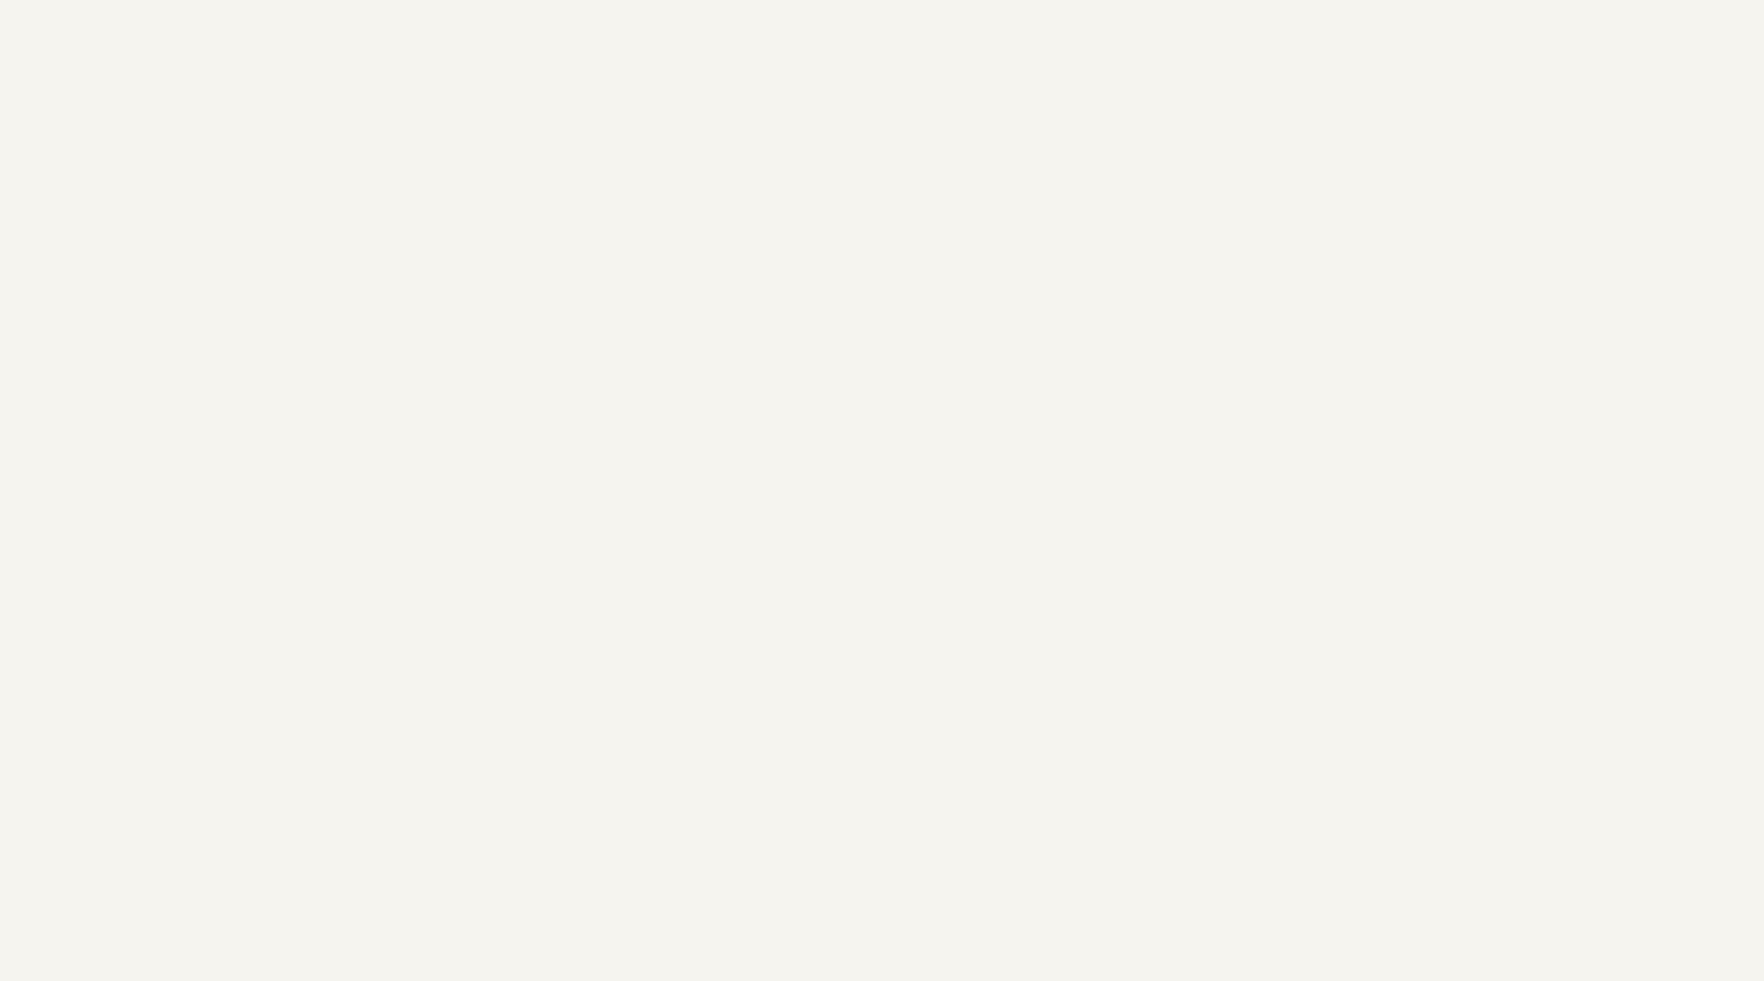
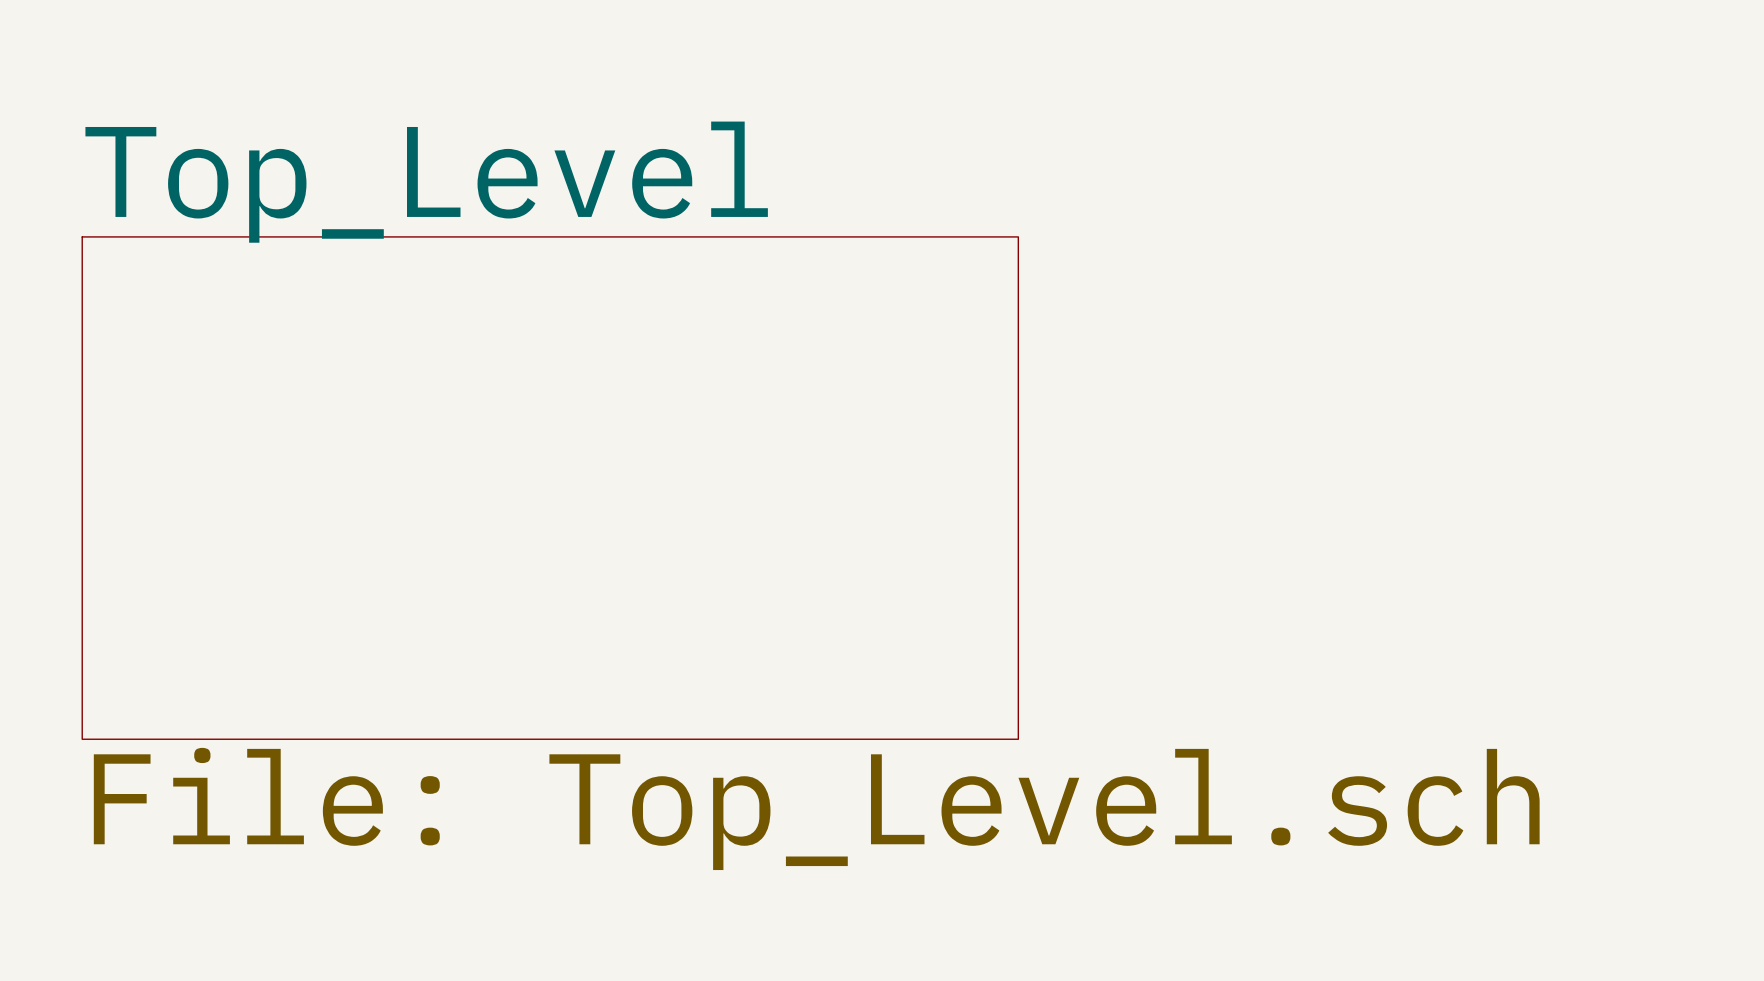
sheet Top_Level: none -> File: Top_Level.sch (550, 488)

